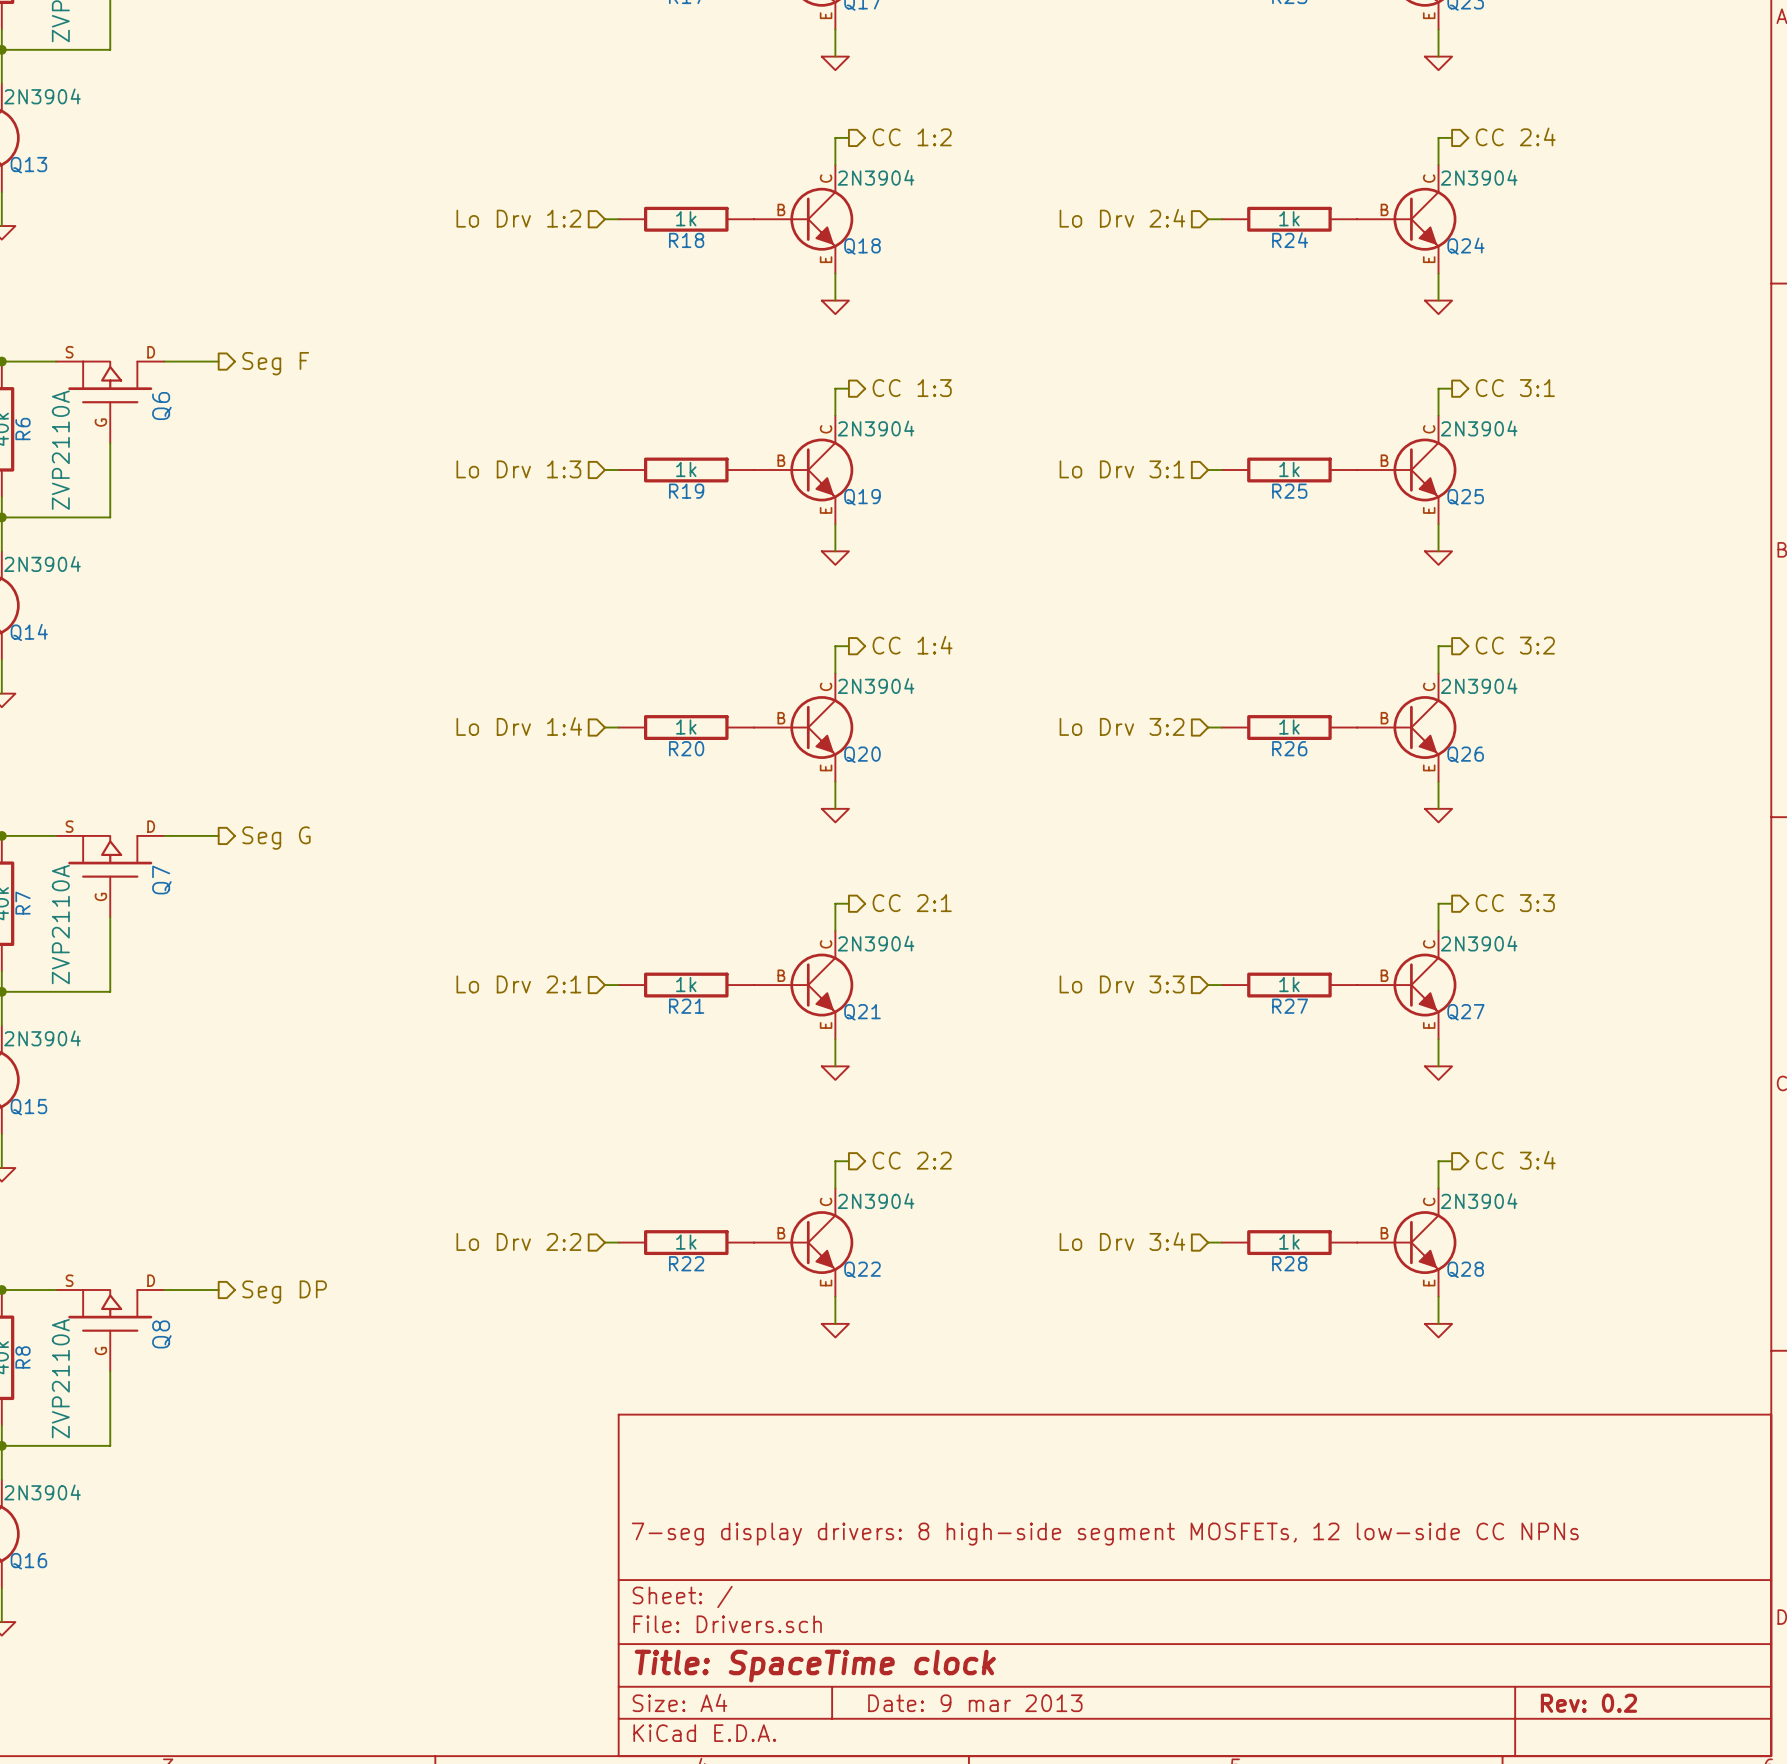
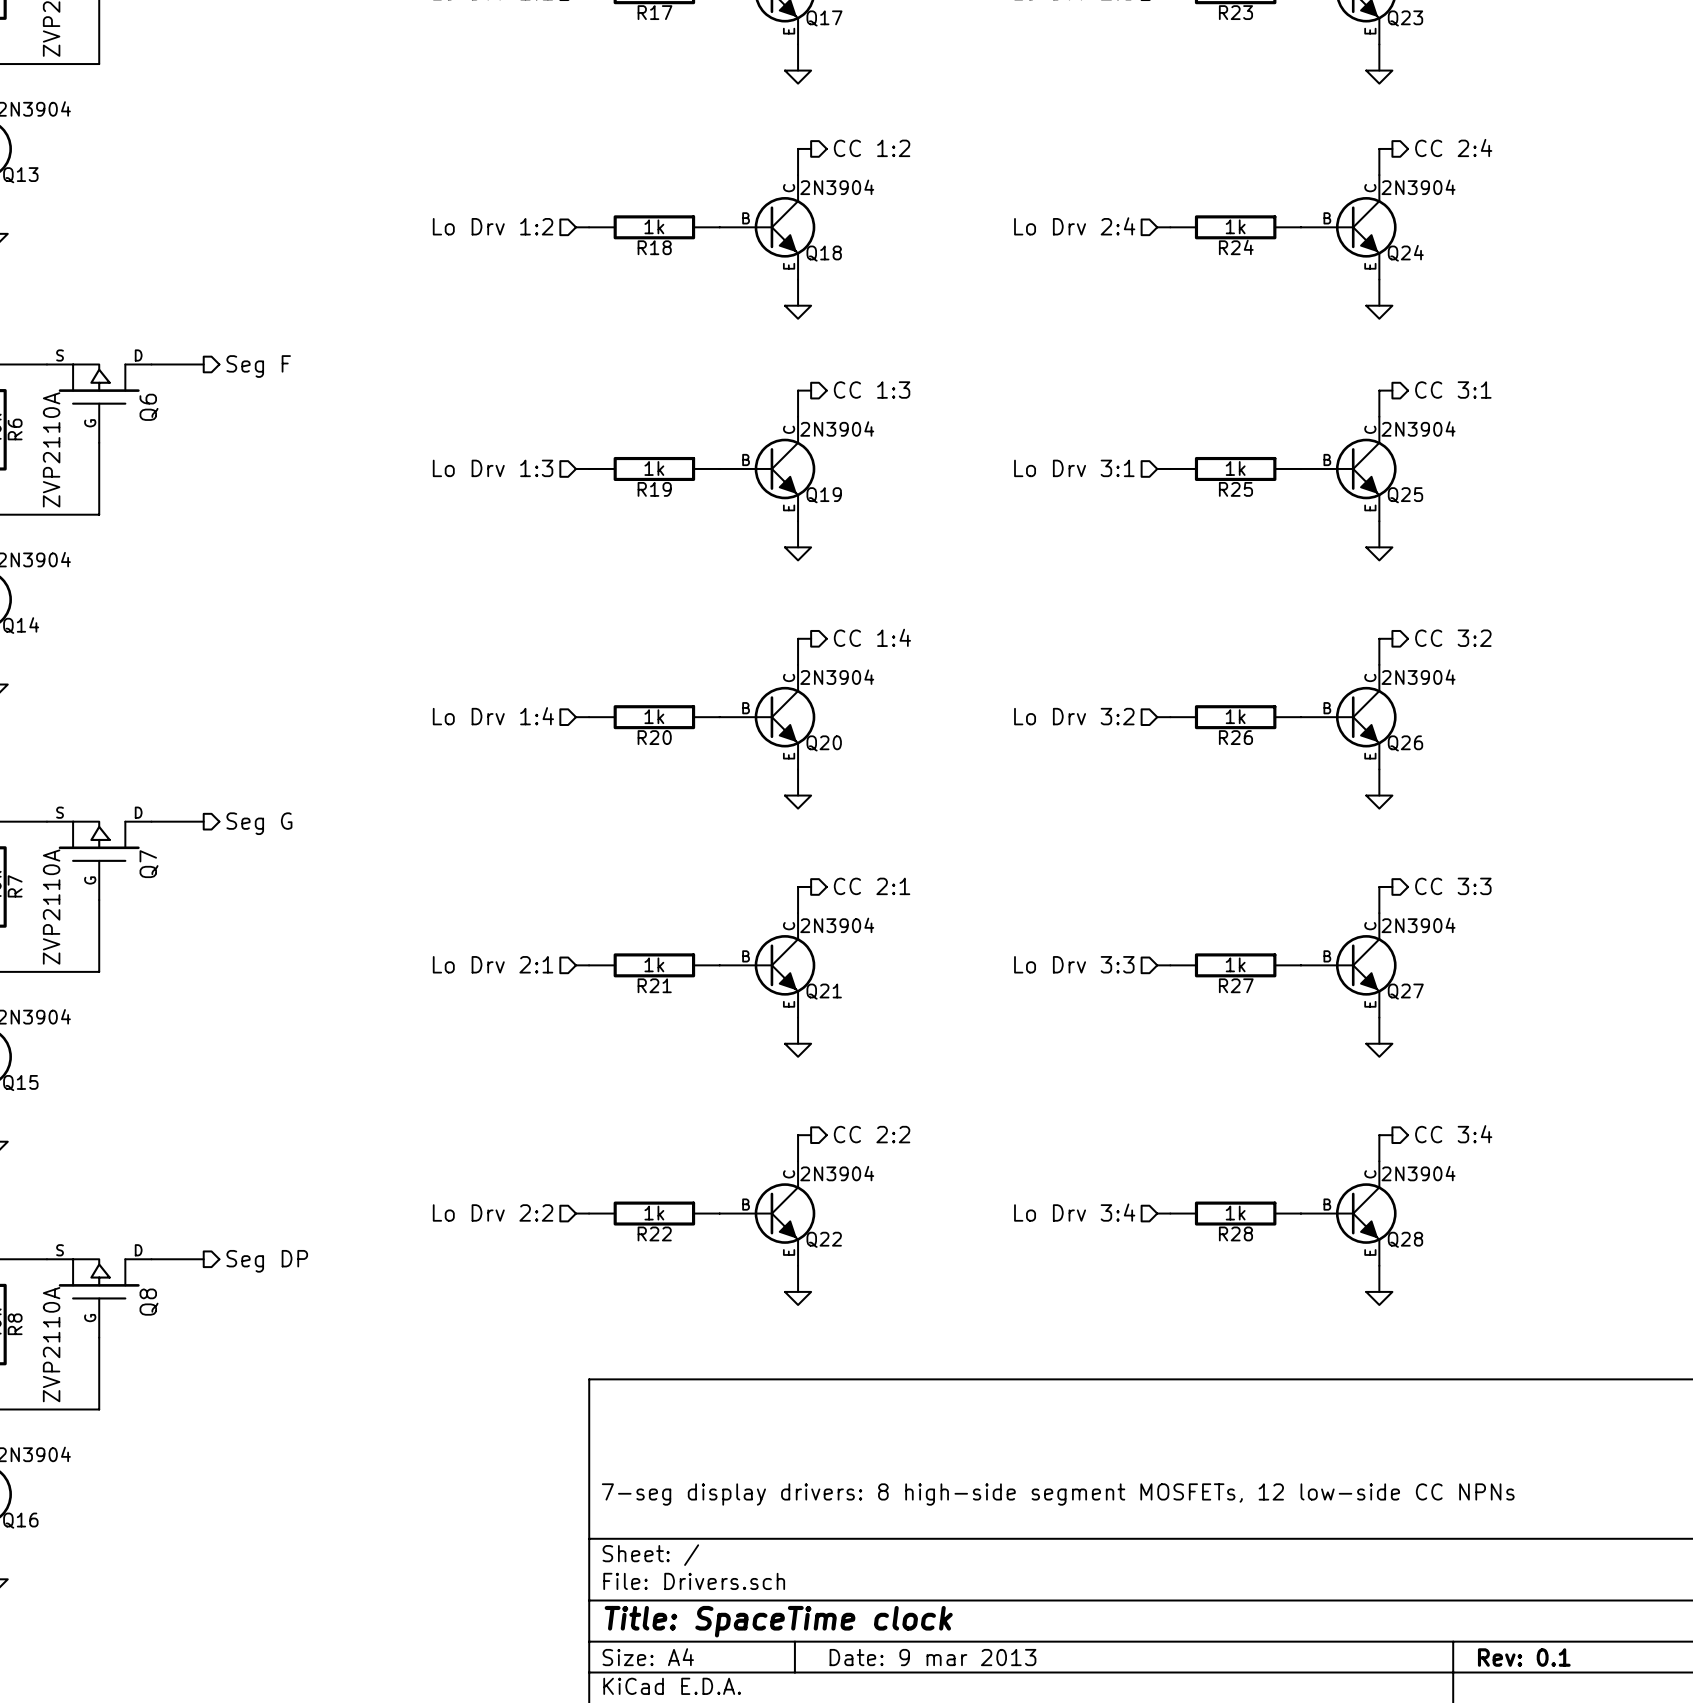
title block: Rev: 0.2 (1588, 1703) -> Rev: 0.1 (1524, 1657)

